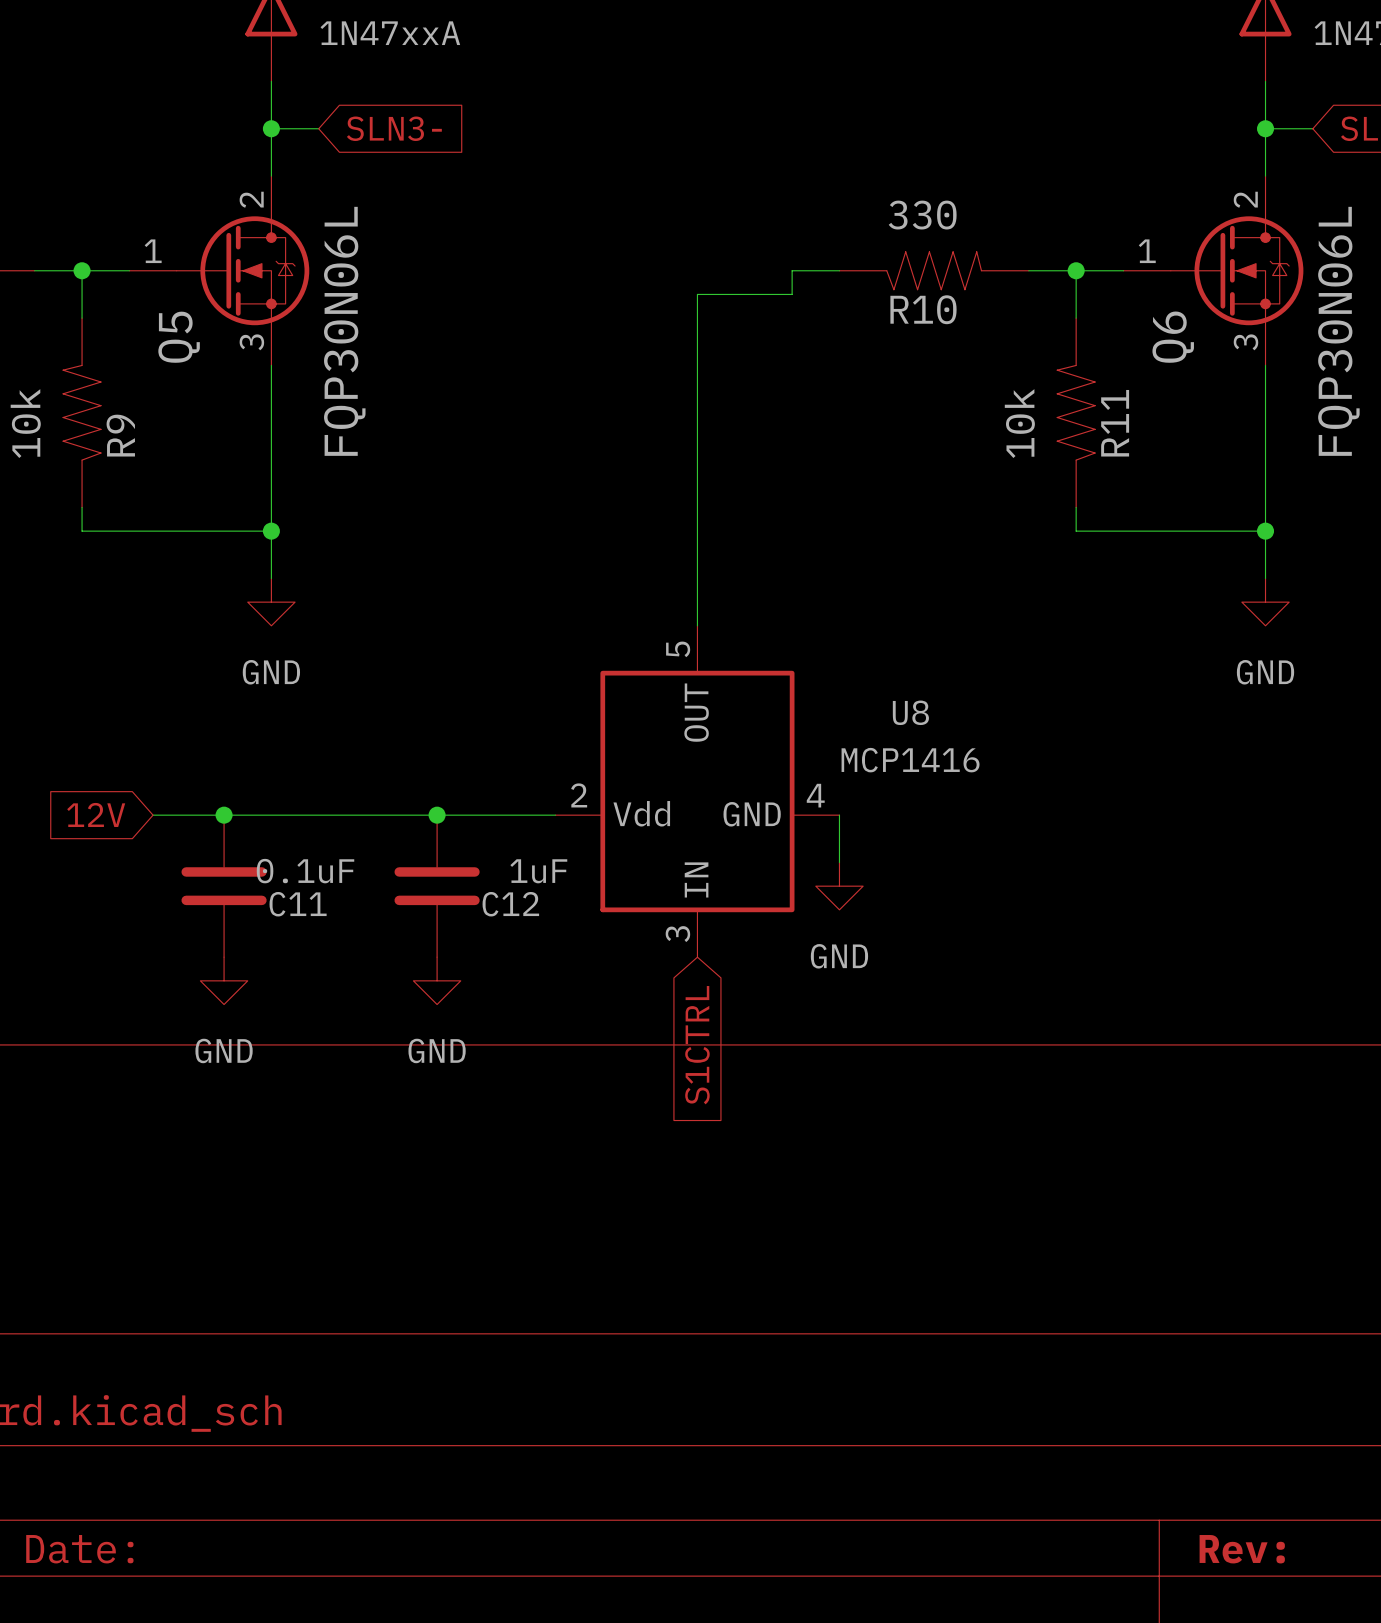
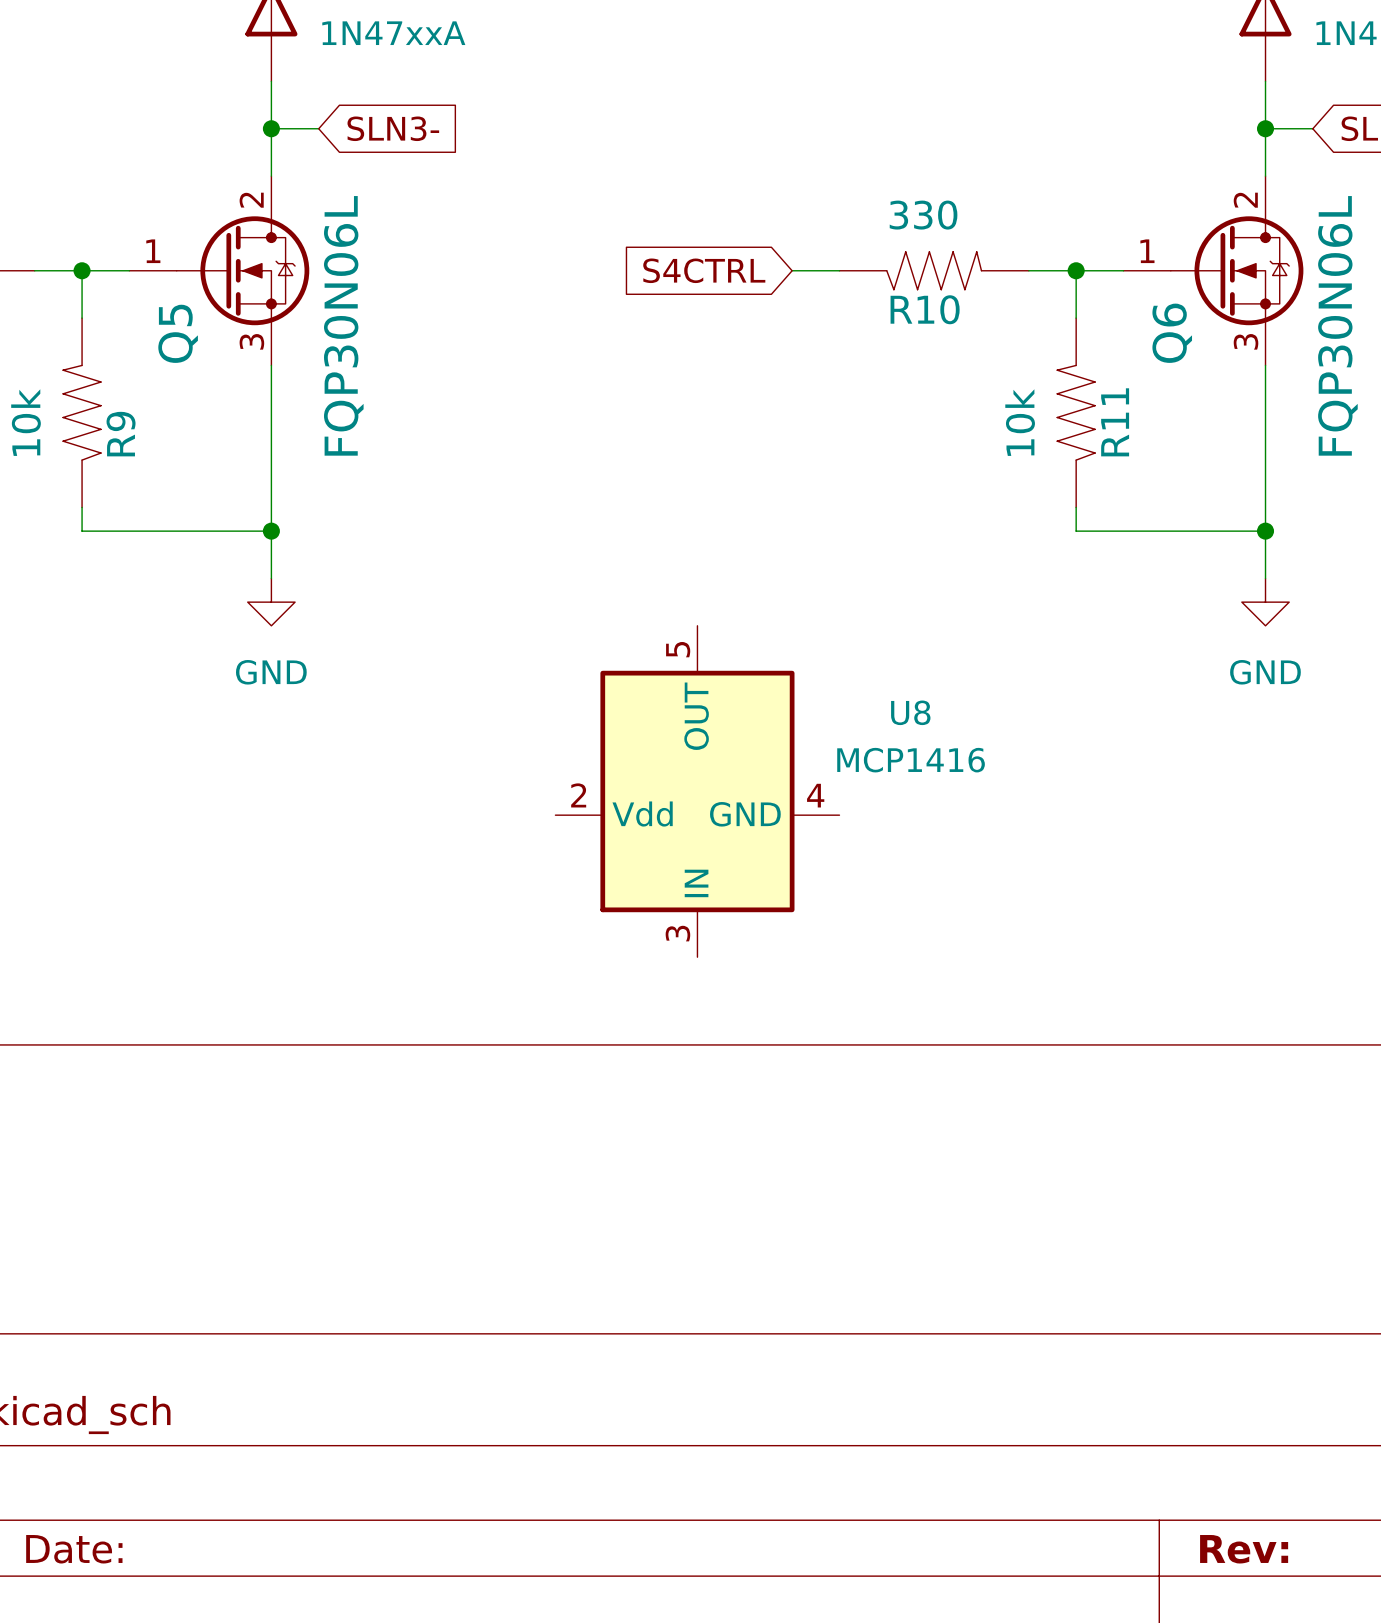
global label: none -> S4CTRL (704, 270)
wire: (792, 270) (792, 294) (697, 294) (697, 625) -> none
global label: 12V (96, 814) -> none
wire: (153, 815) (555, 815) -> none
junction: (224, 815) -> none
junction: (437, 815) -> none
wire: (839, 815) (839, 862) -> none
C11: 0.1uF (224, 886) -> none
C12: 1uF (437, 886) -> none
power symbol: GND (839, 886) -> none
power symbol: GND (224, 980) -> none
power symbol: GND (437, 980) -> none
global label: S1CTRL (697, 1045) -> none

